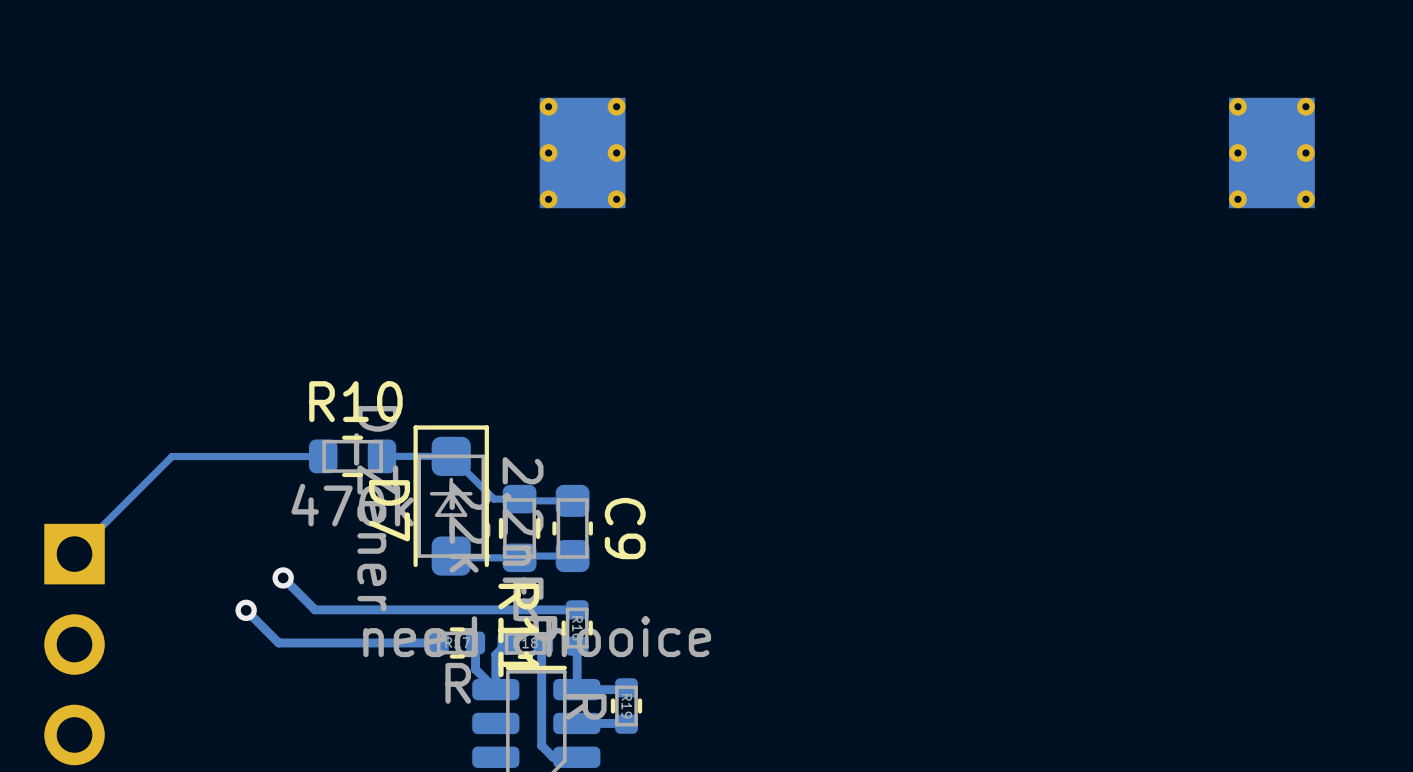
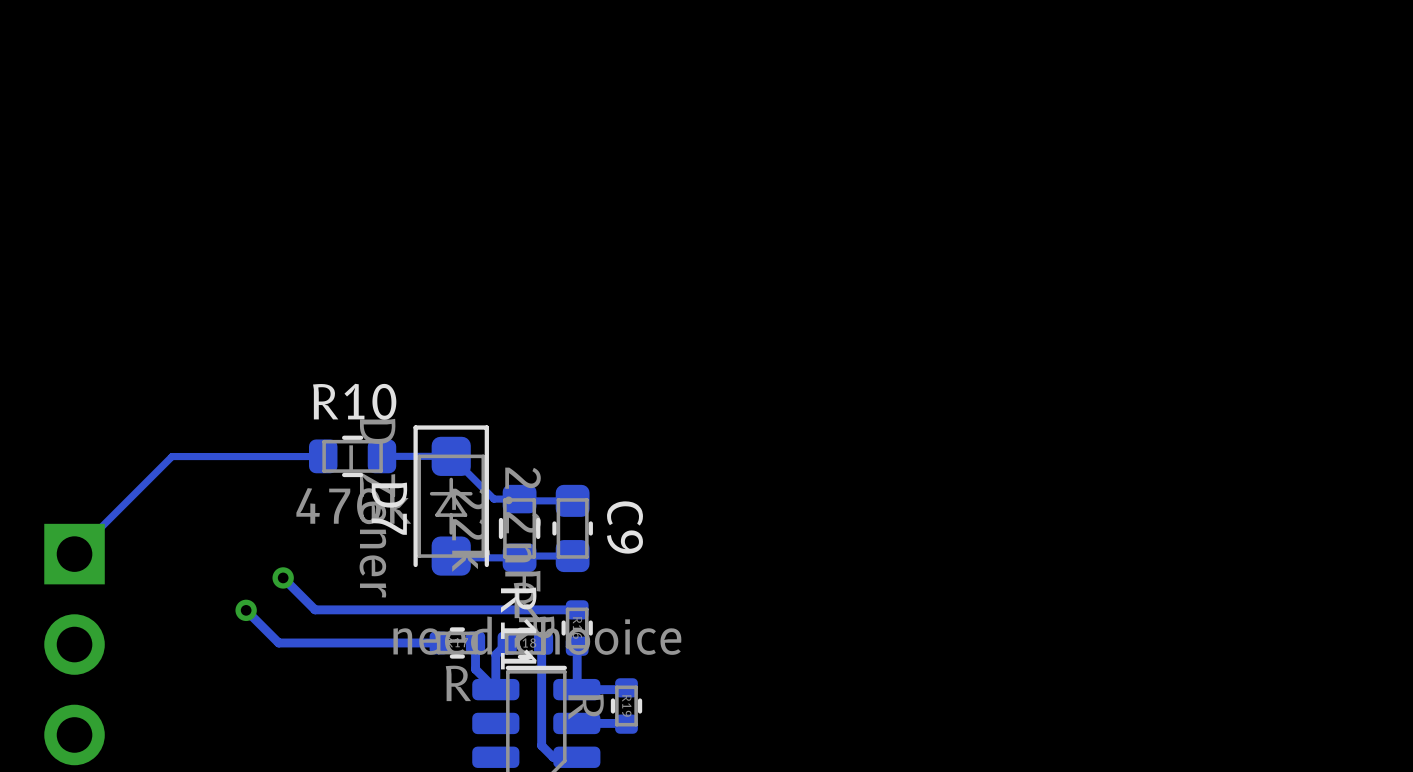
part: (582, 153) -> none
part: (1271, 153) -> none

